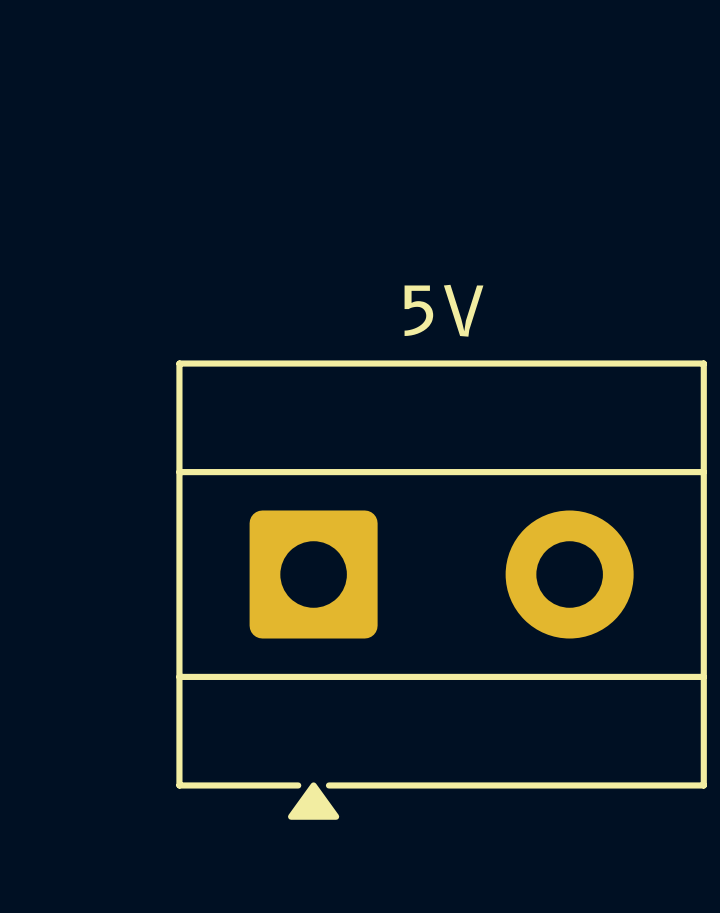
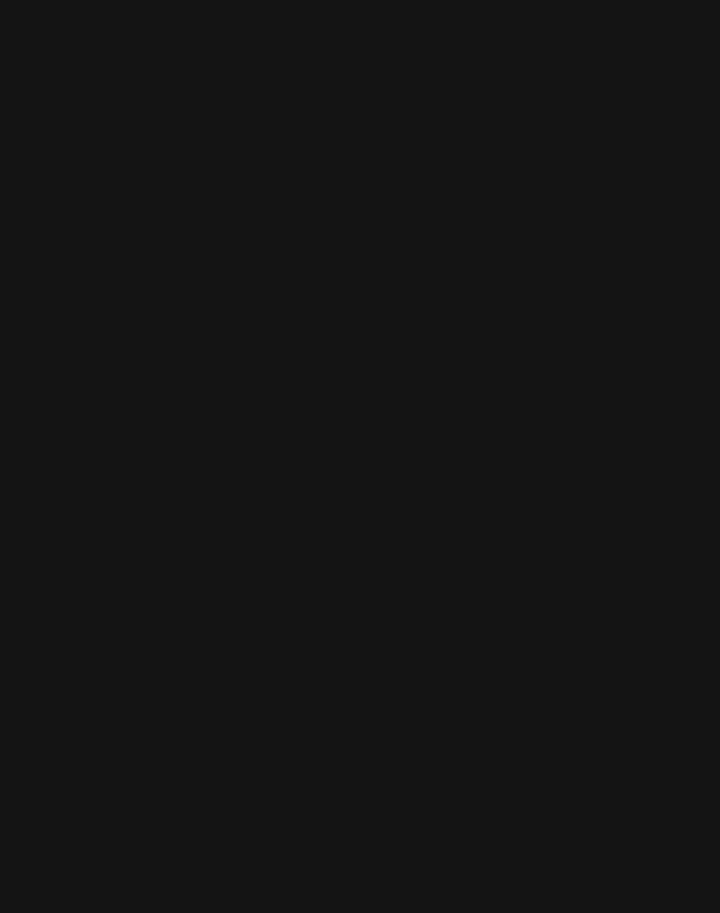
5V: (441, 590) -> none

